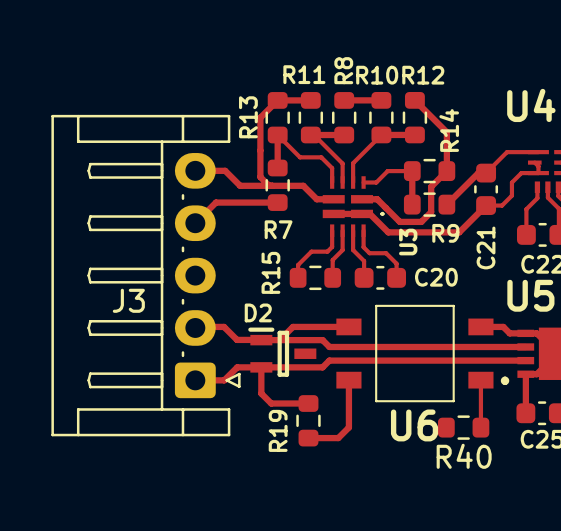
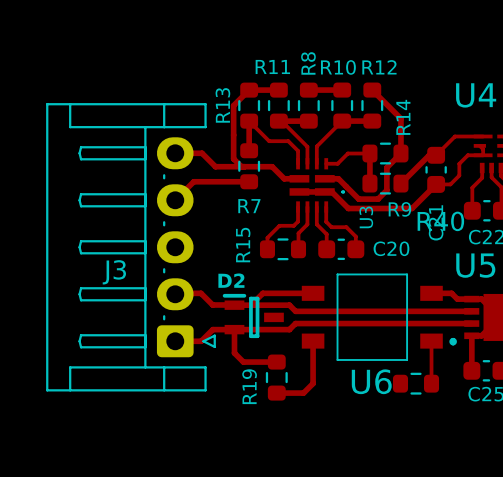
R40 name position: R40 (464, 456) -> R40 (440, 221)

